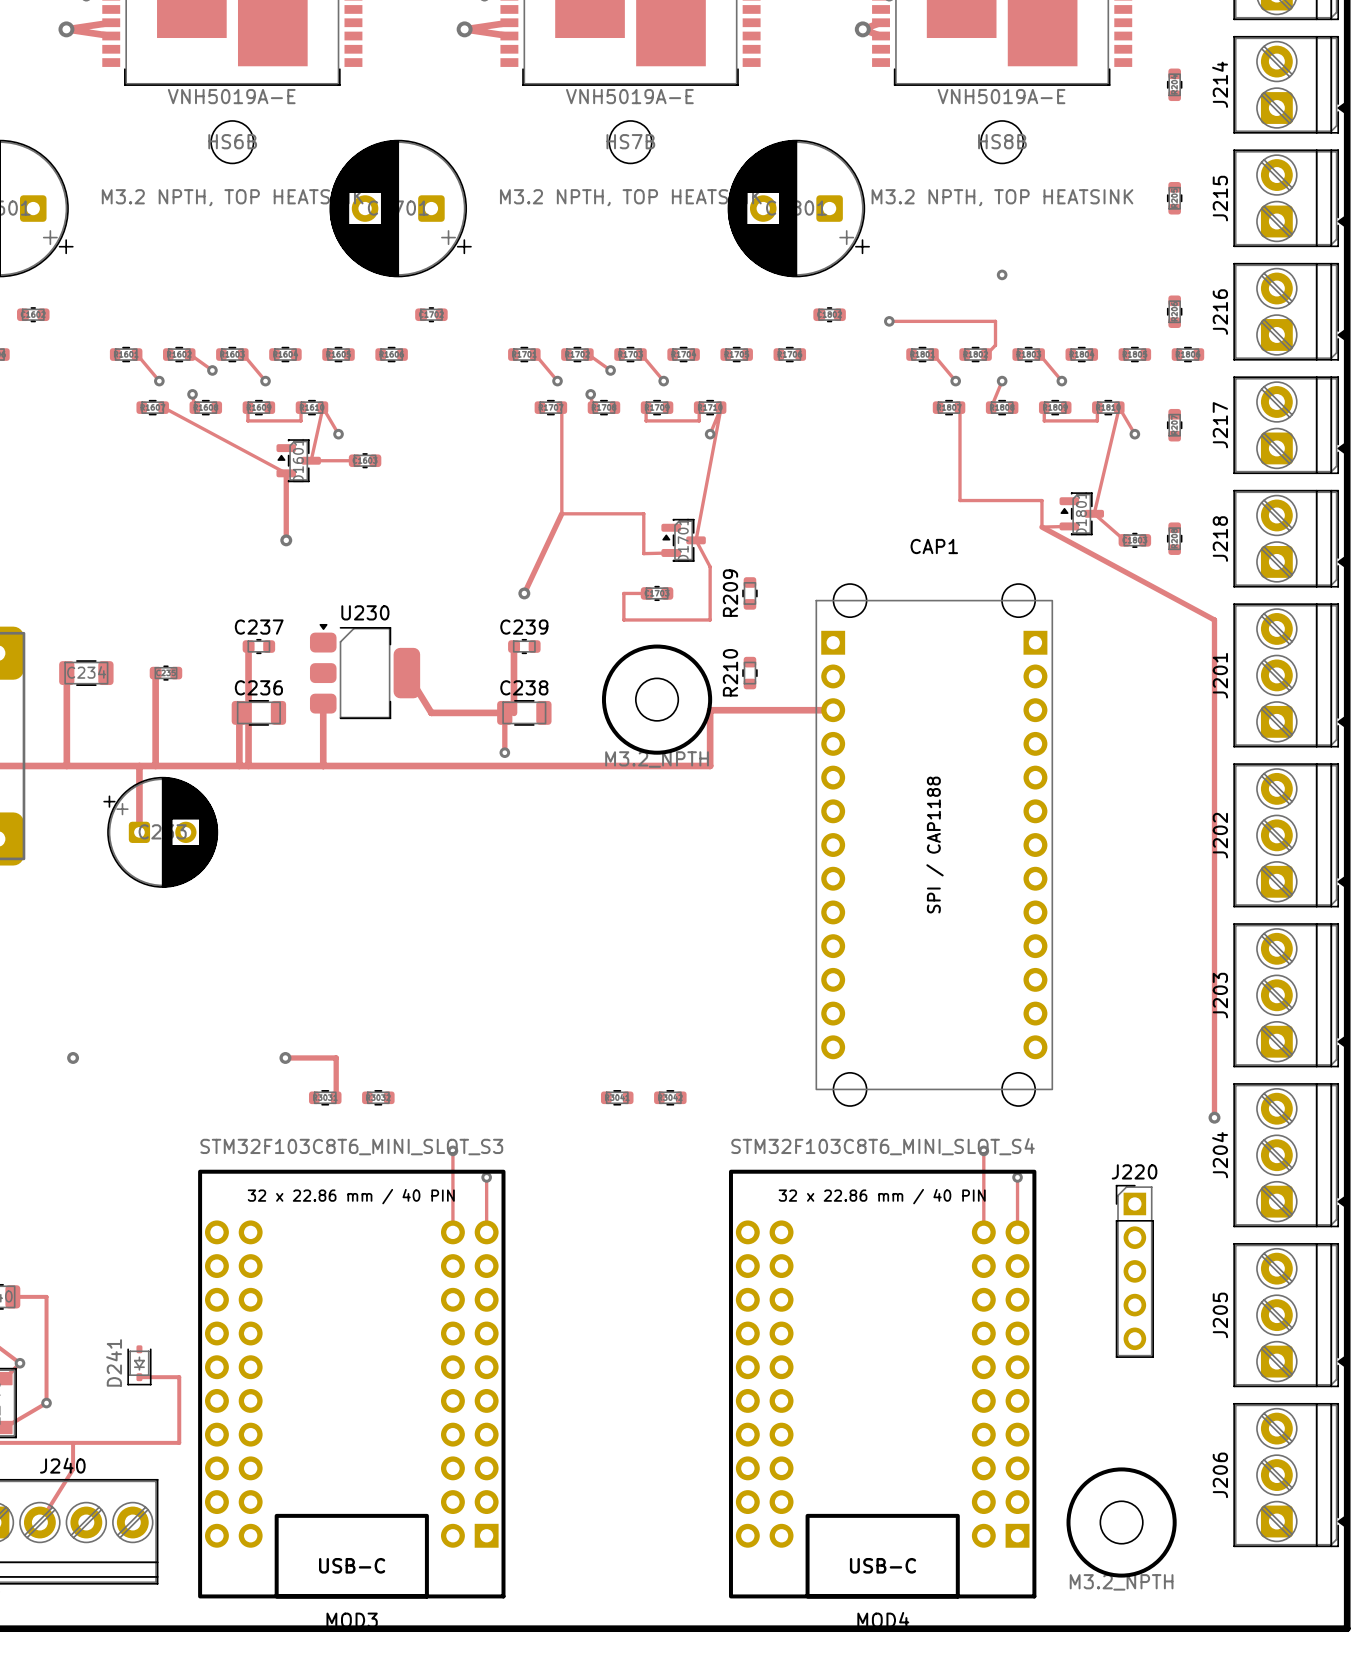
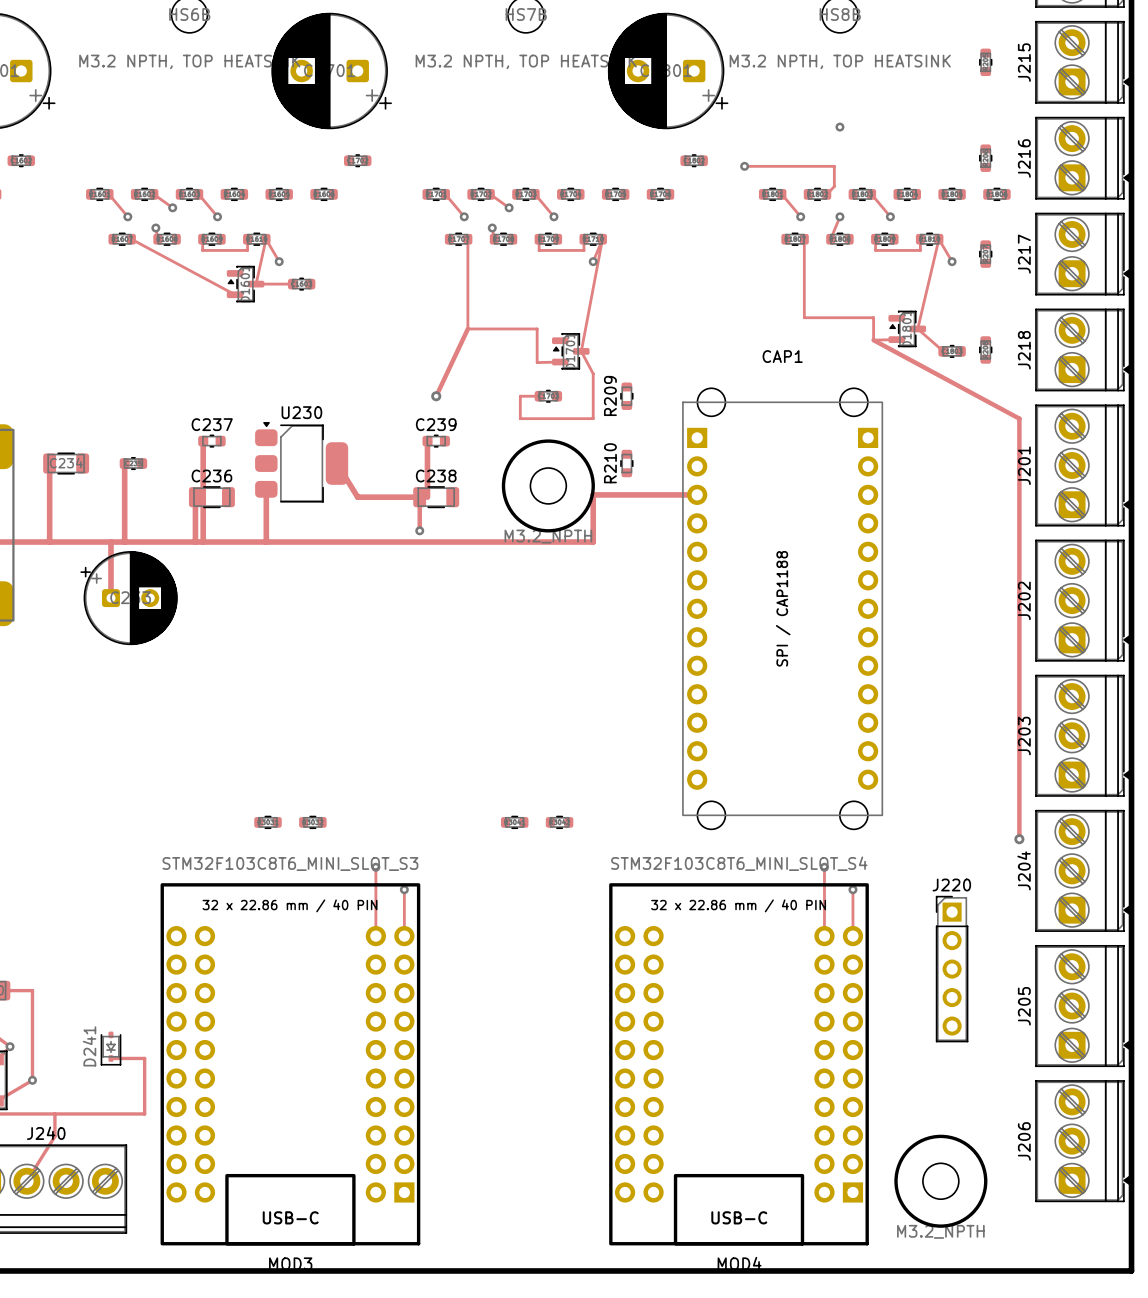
track: (286, 473) (286, 540) -> none
via: (286, 540) -> none
via: (73, 1057) -> none
track: (285, 1057) (336, 1057) (336, 1097) -> none
via: (285, 1057) -> none

